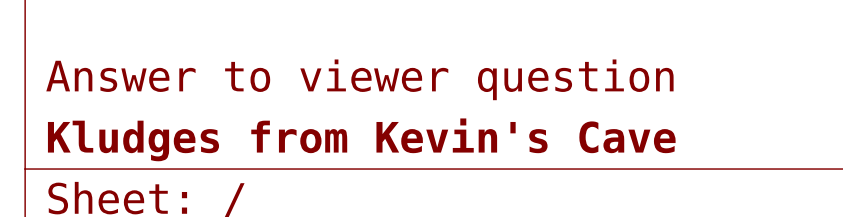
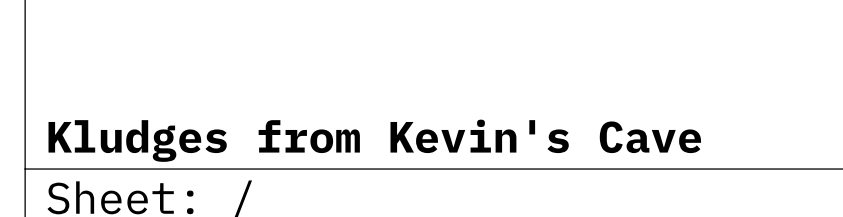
title block: Answer to viewer question (359, 79) -> none

